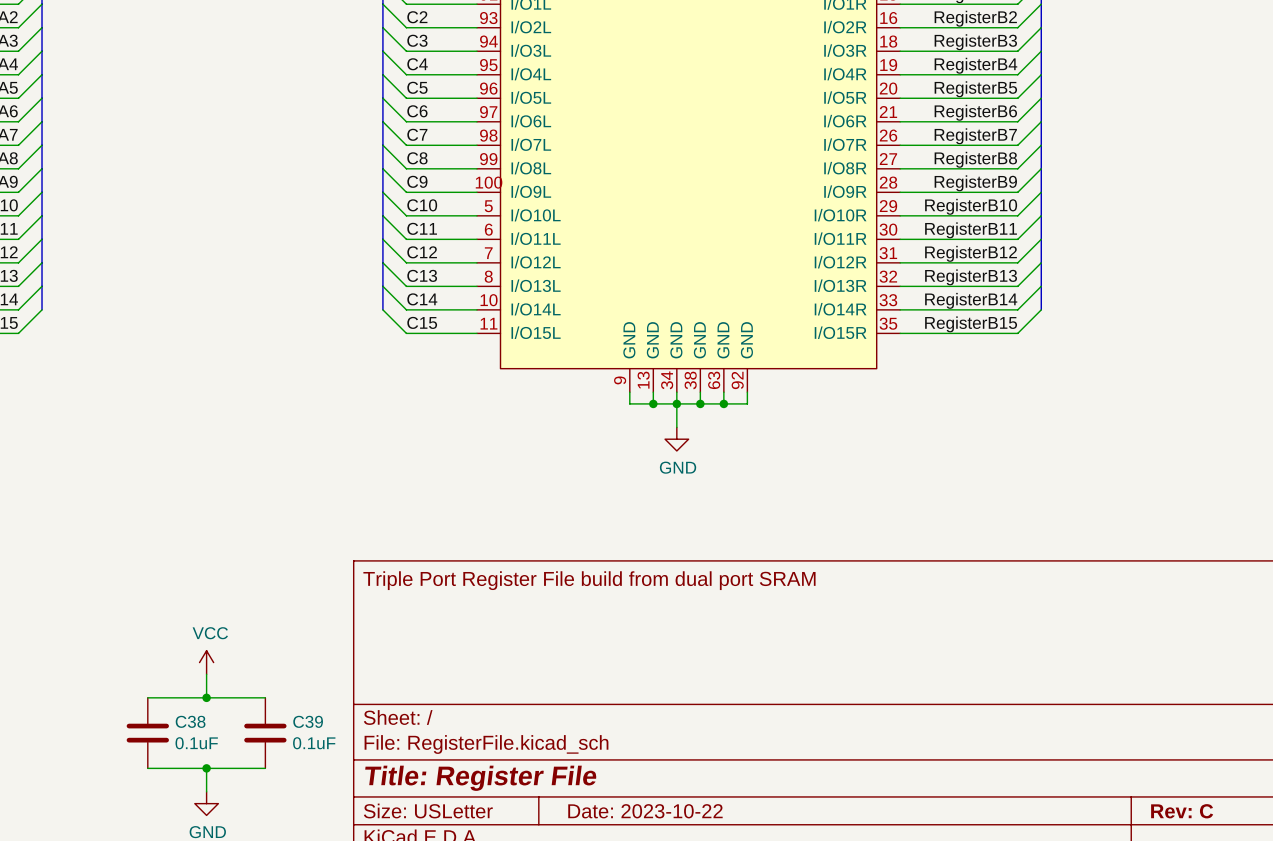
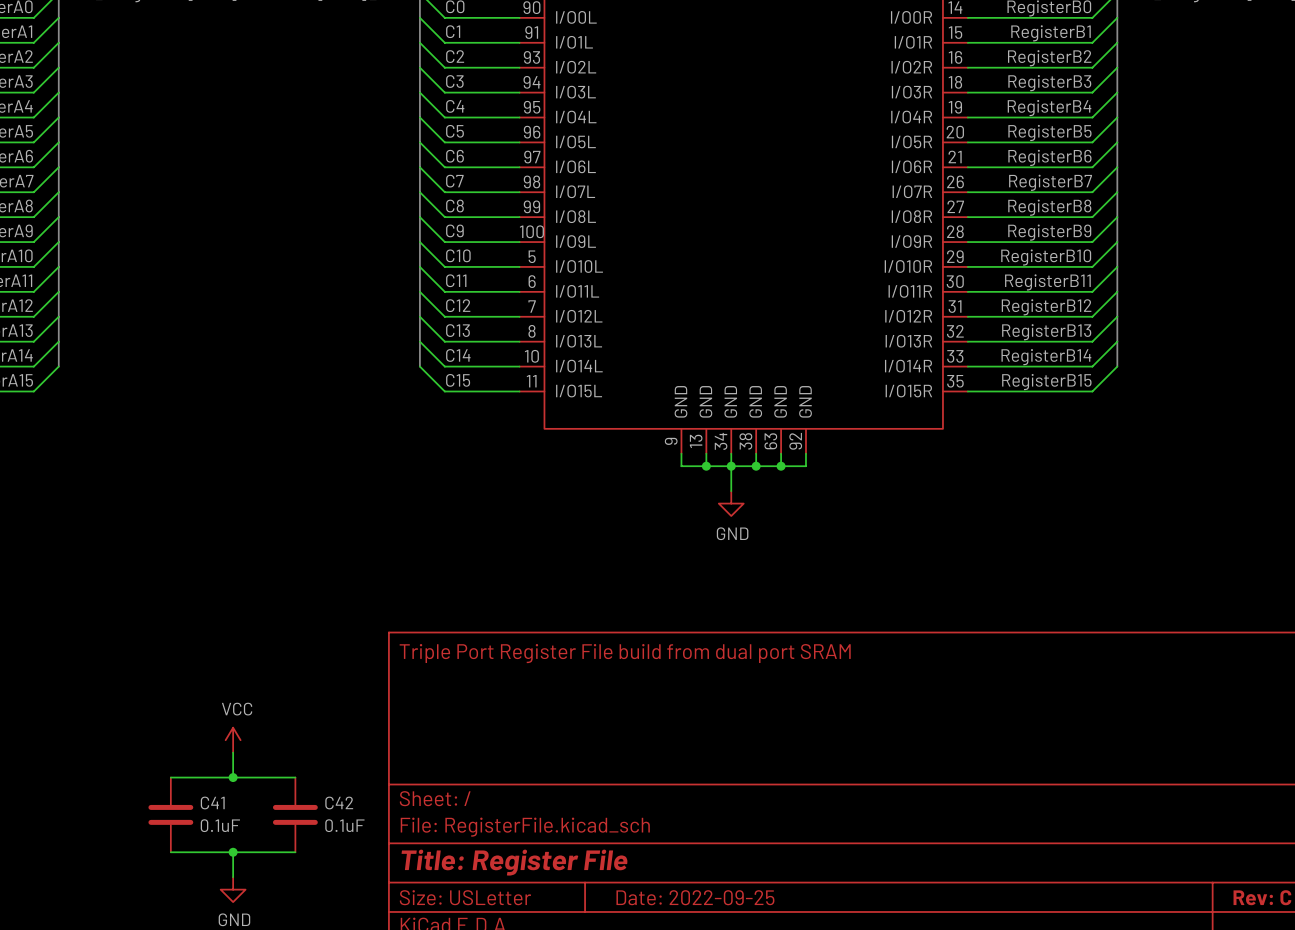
C38 name: C38 (190, 721) -> C41 (212, 802)
C39 name: C39 (308, 721) -> C42 (339, 802)
title block: Date: 2023-10-22 (645, 811) -> Date: 2022-09-25 (695, 897)

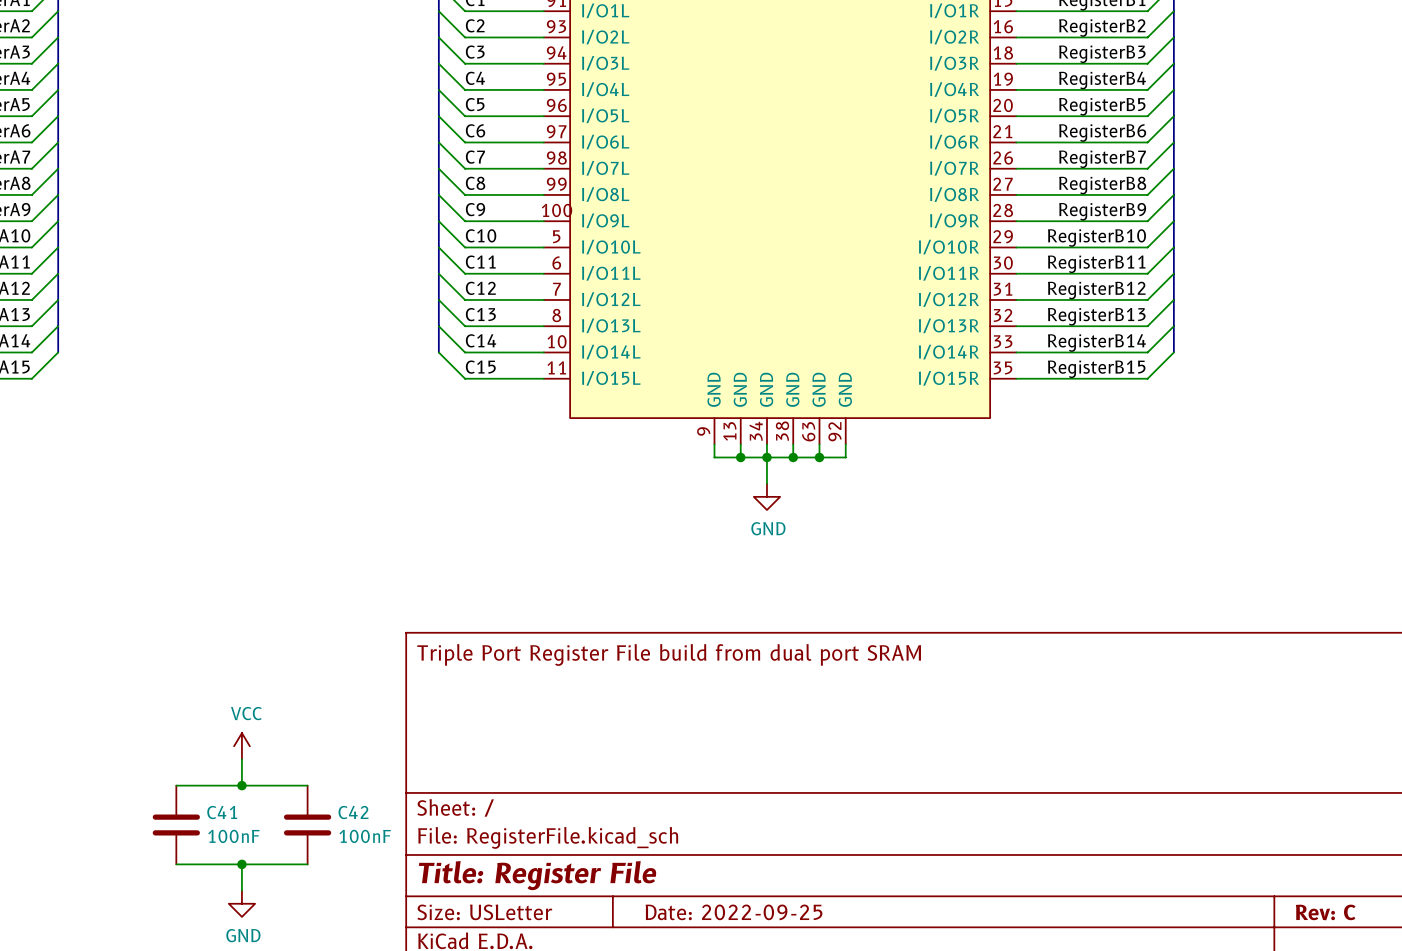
C41 value: 0.1uF (220, 825) -> 100nF (233, 836)
C42 value: 0.1uF (344, 825) -> 100nF (365, 836)

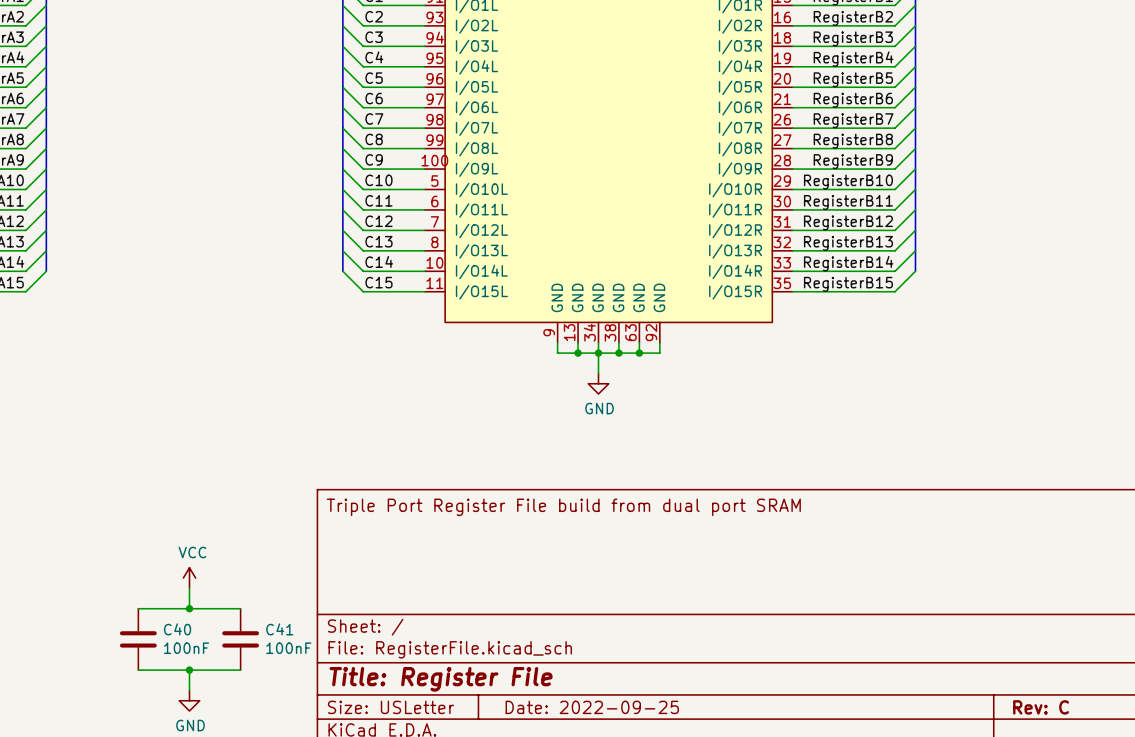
C41 name: C41 (222, 812) -> C40 (177, 629)
C42 name: C42 (353, 812) -> C41 (279, 629)

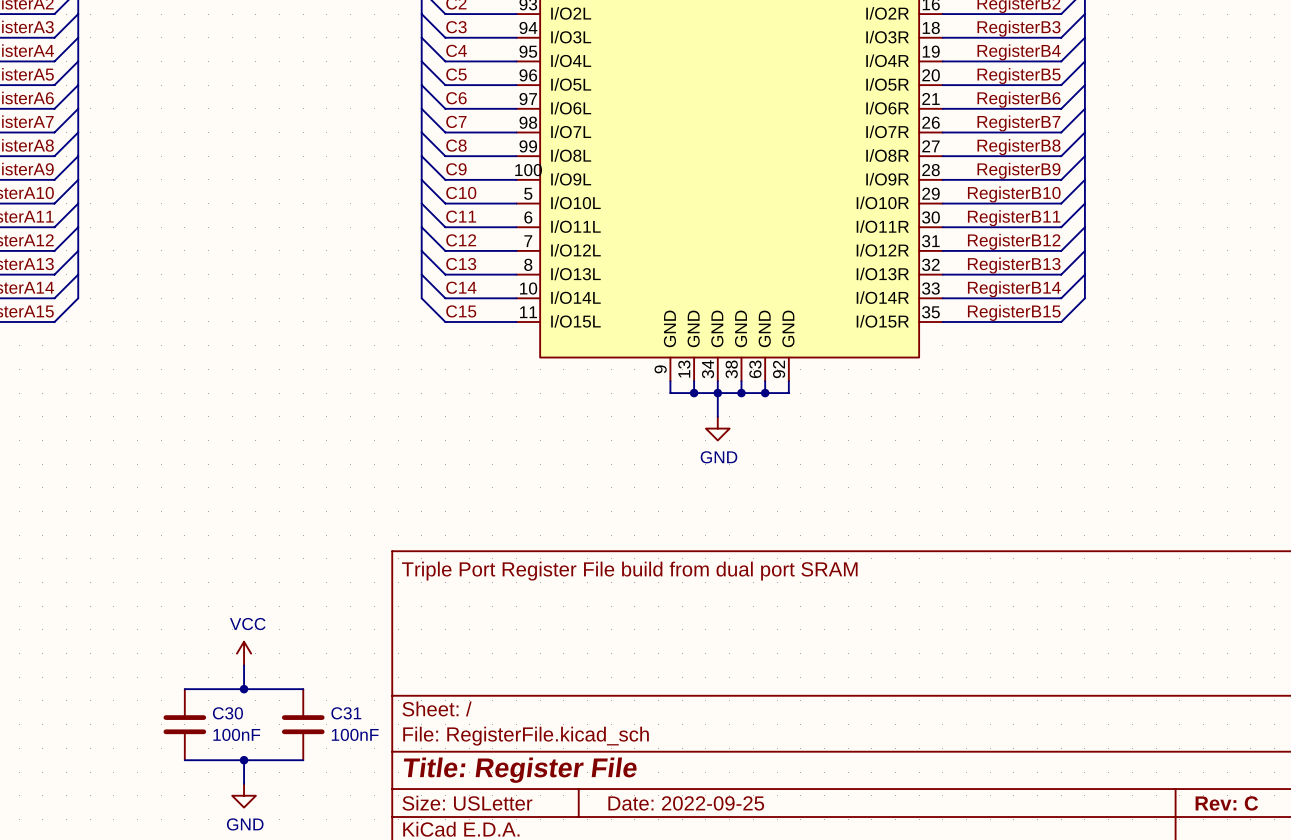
C40 name: C40 (177, 629) -> C30 (227, 713)
C41 name: C41 (279, 629) -> C31 (346, 713)

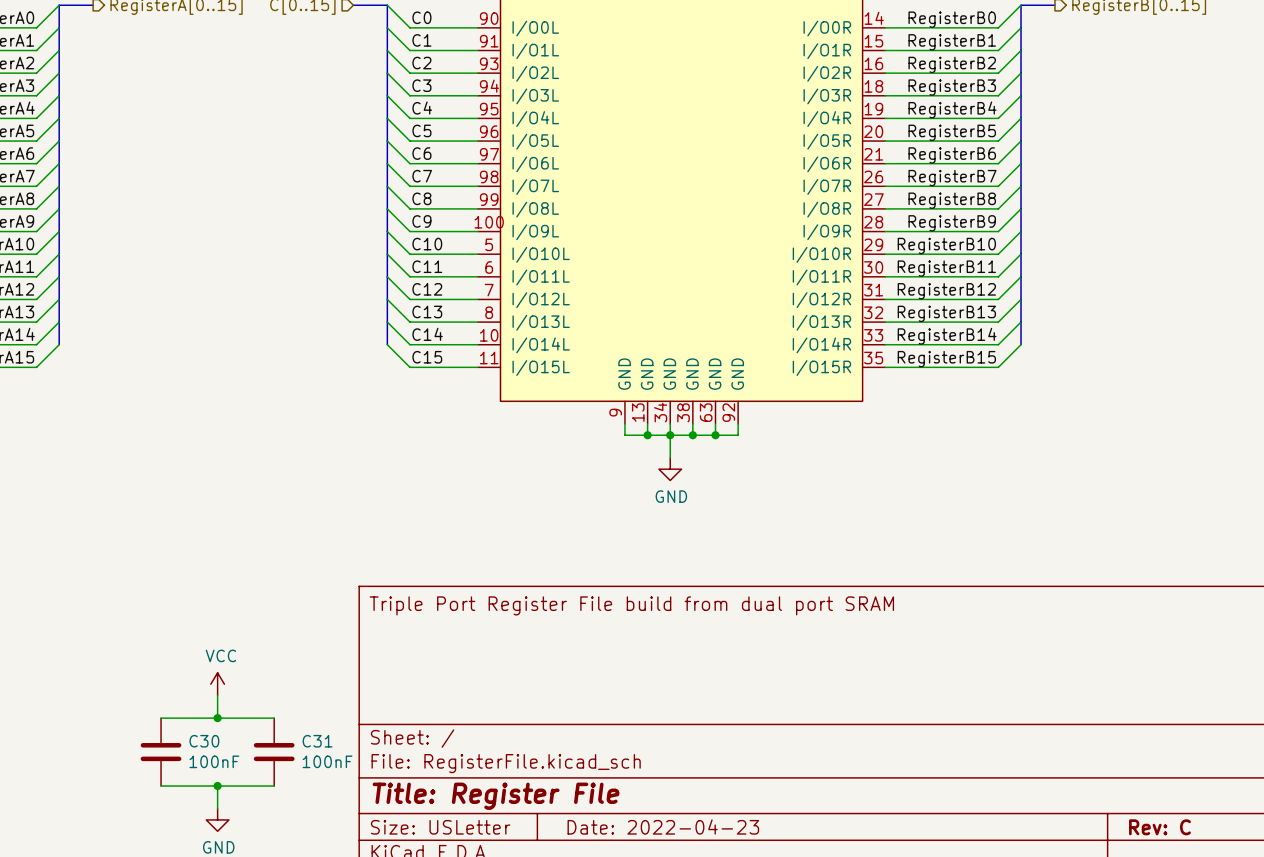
title block: Date: 2022-09-25 (686, 803) -> Date: 2022-04-23 (663, 826)

